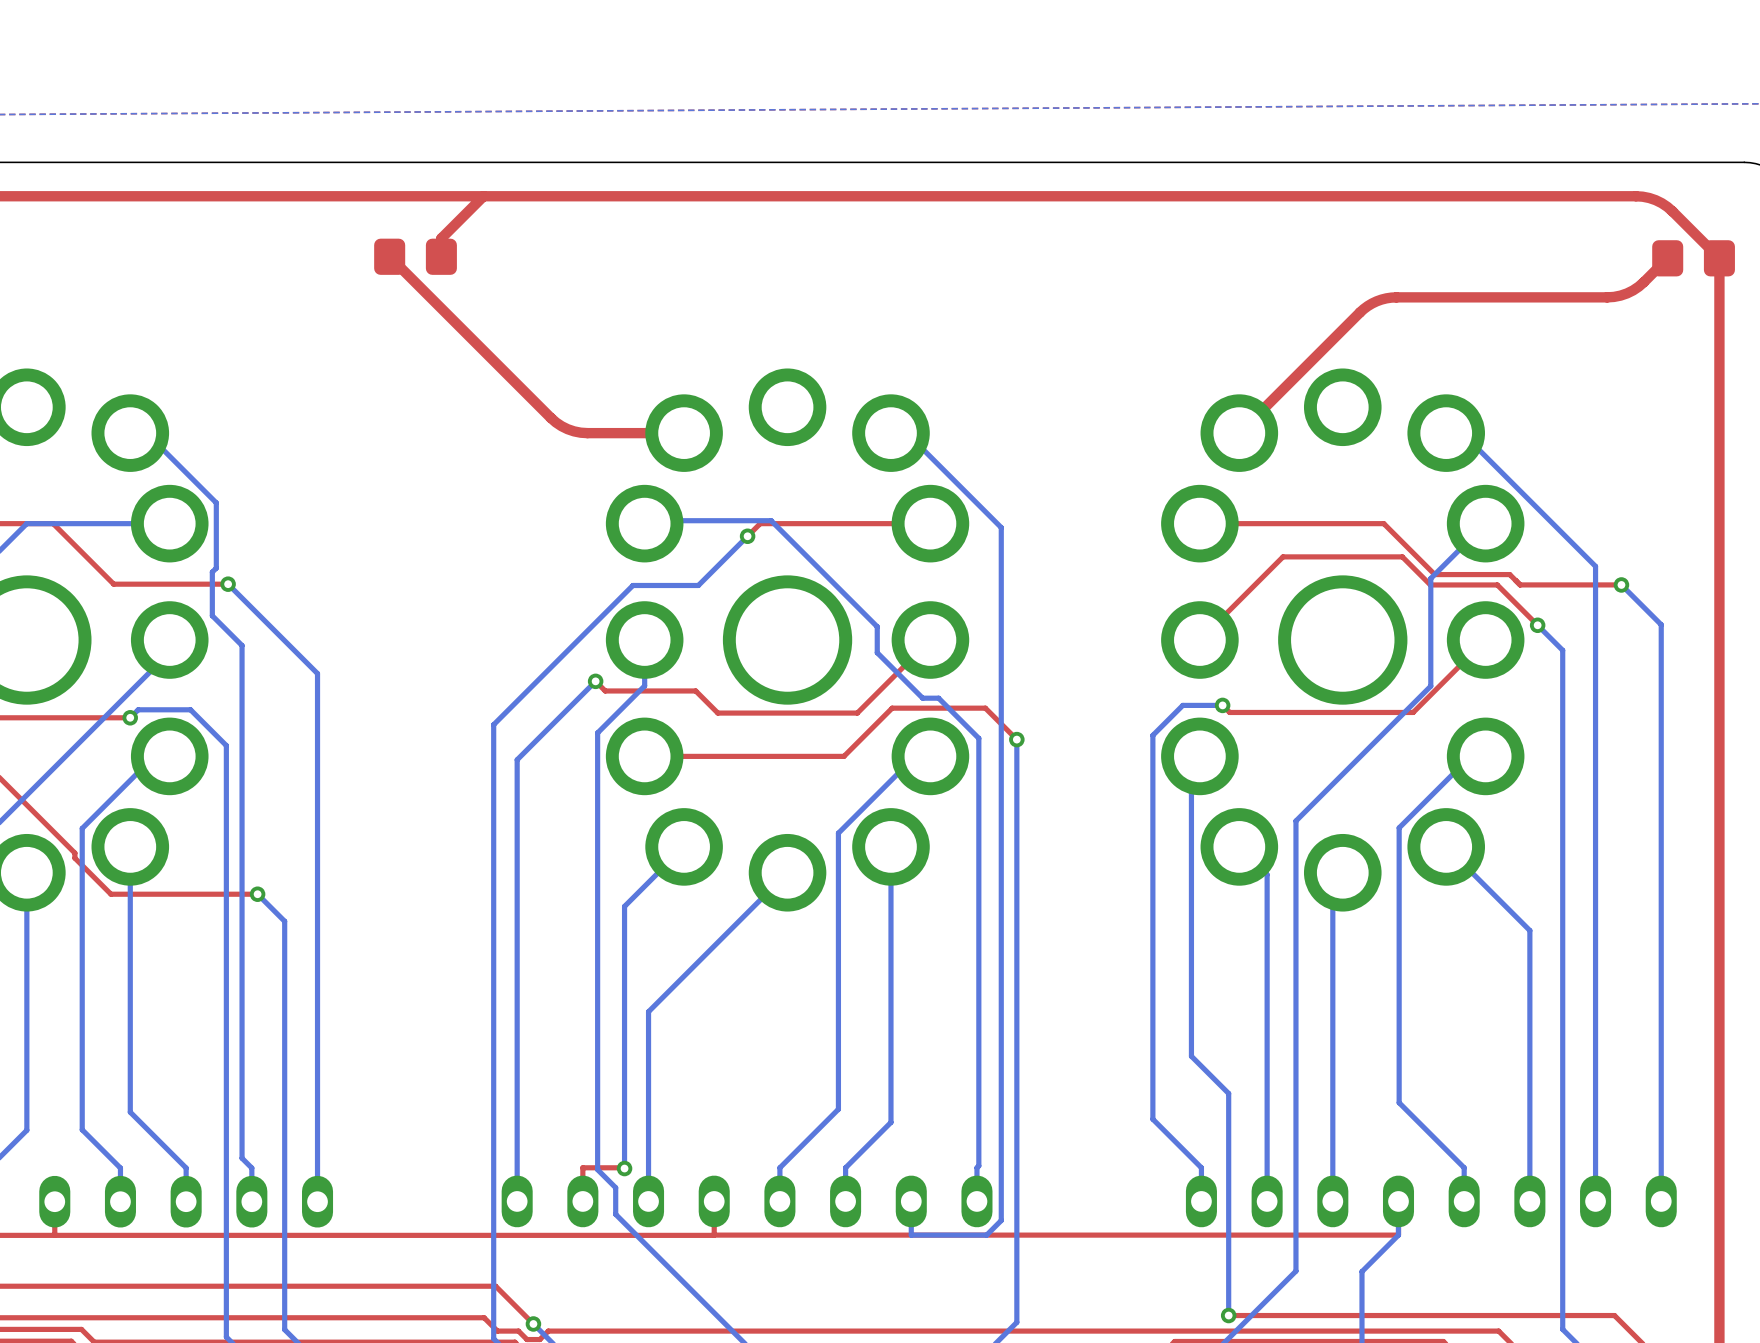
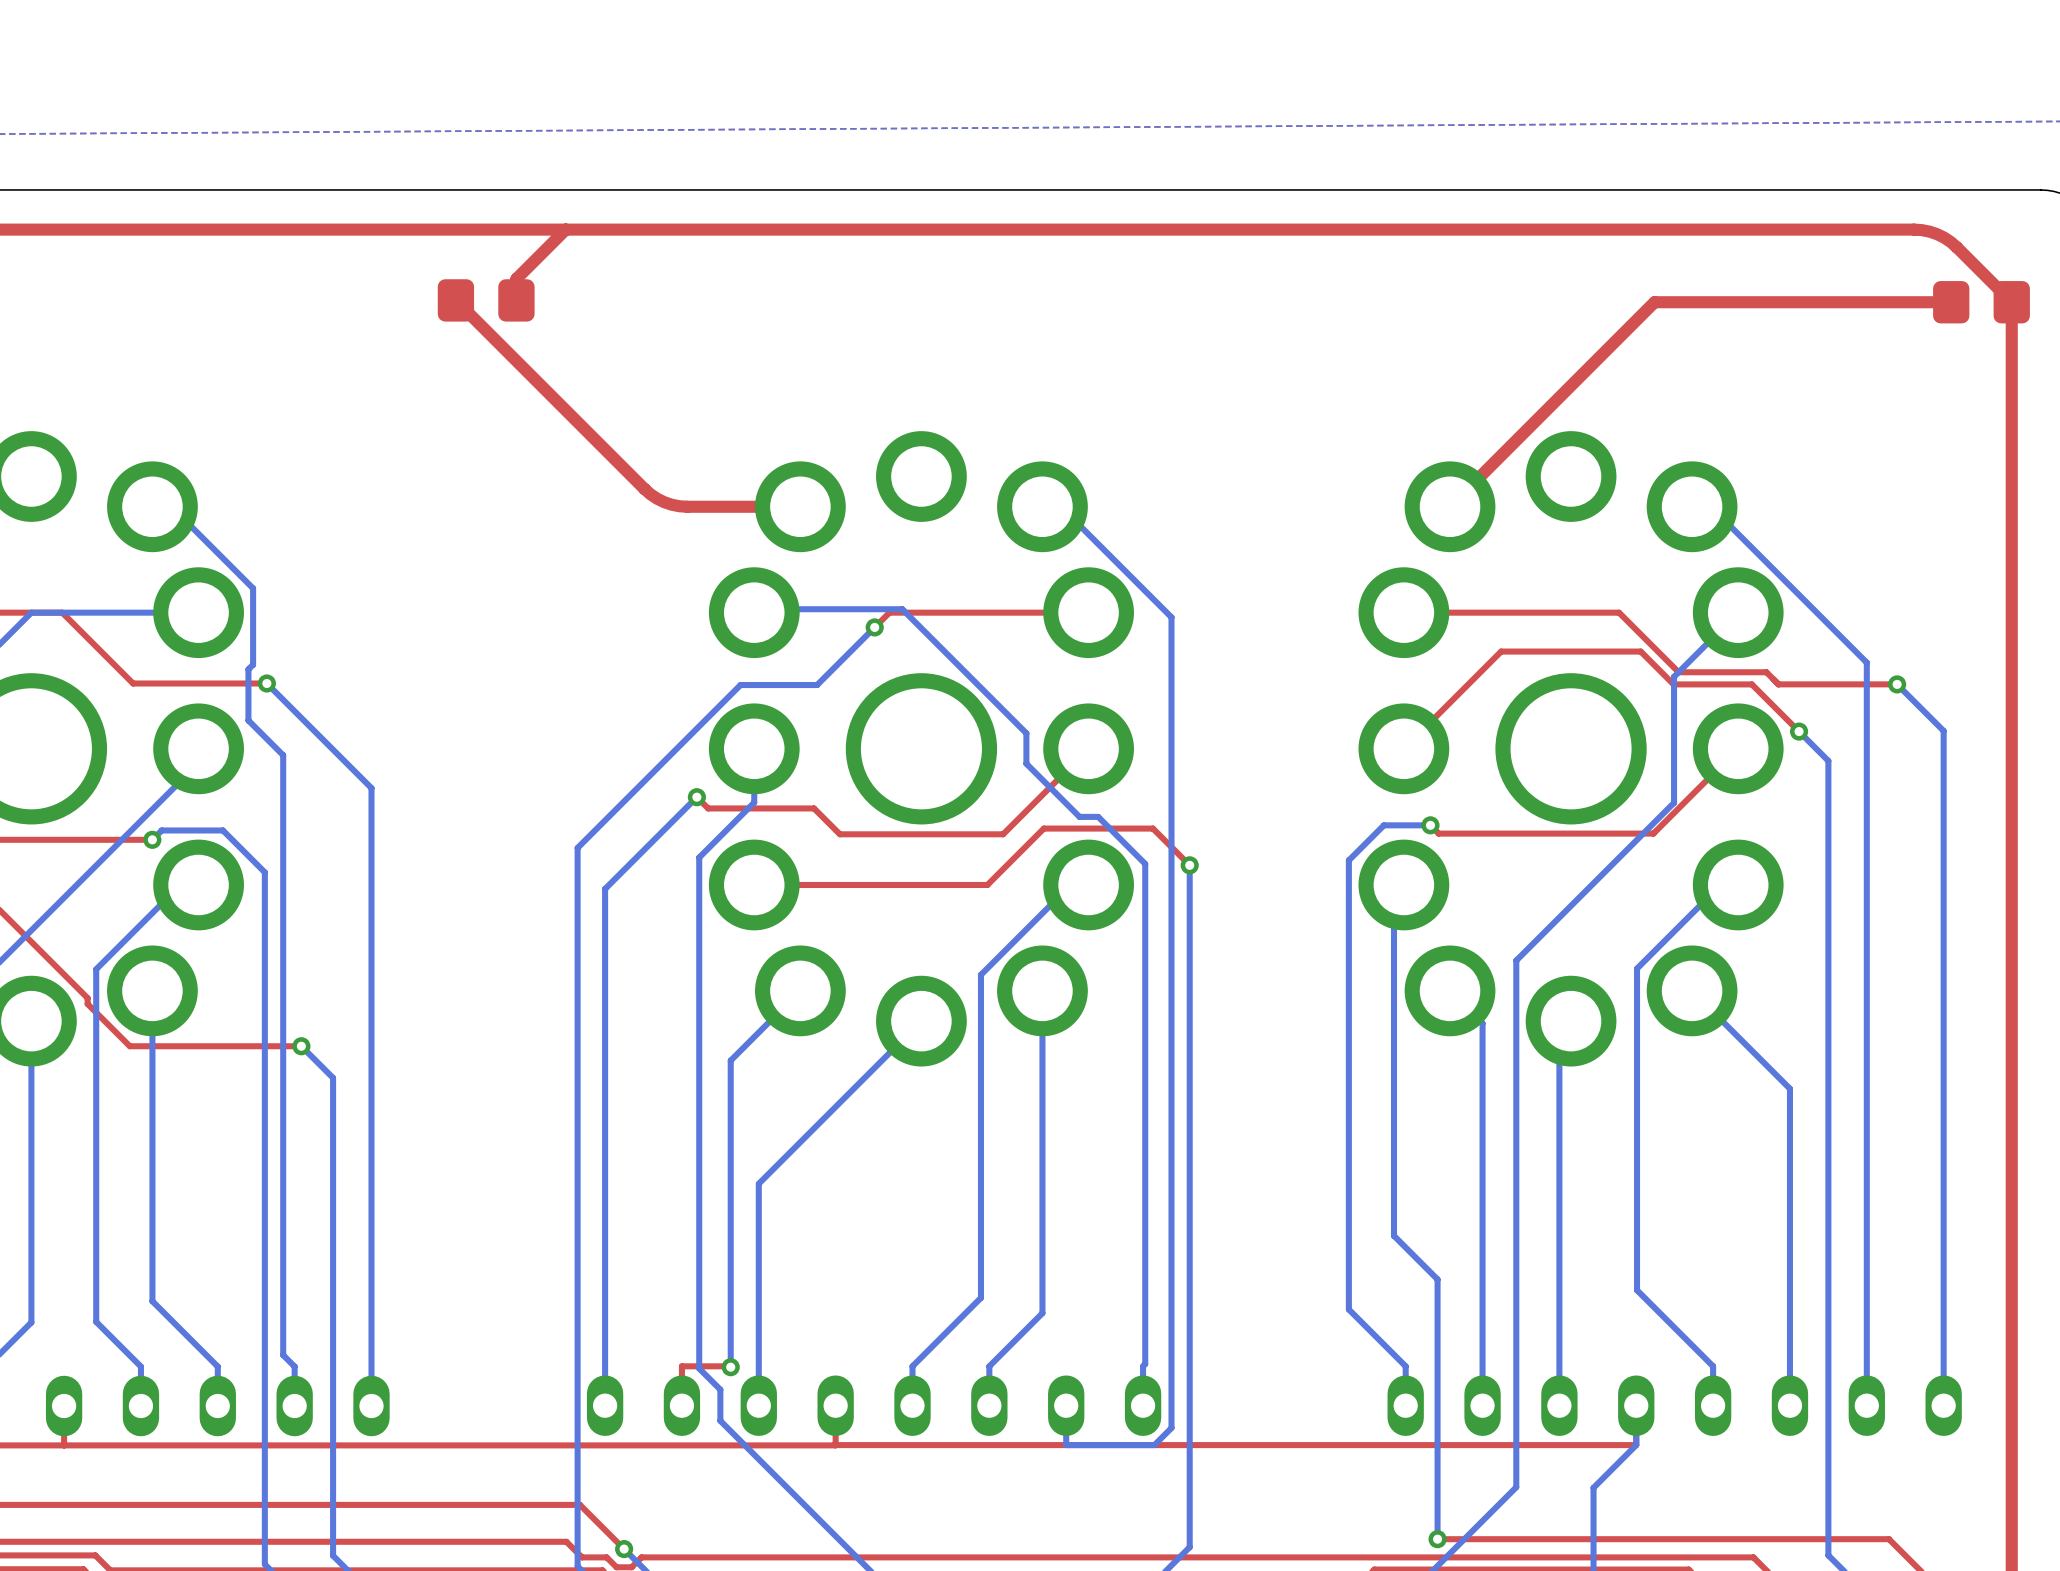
top track: (1667, 258) (1638, 286) (1627, 293) (1613, 296) (1391, 297) (1376, 301) (1359, 312) -> (1951, 302) (1654, 302) (1591, 365)

